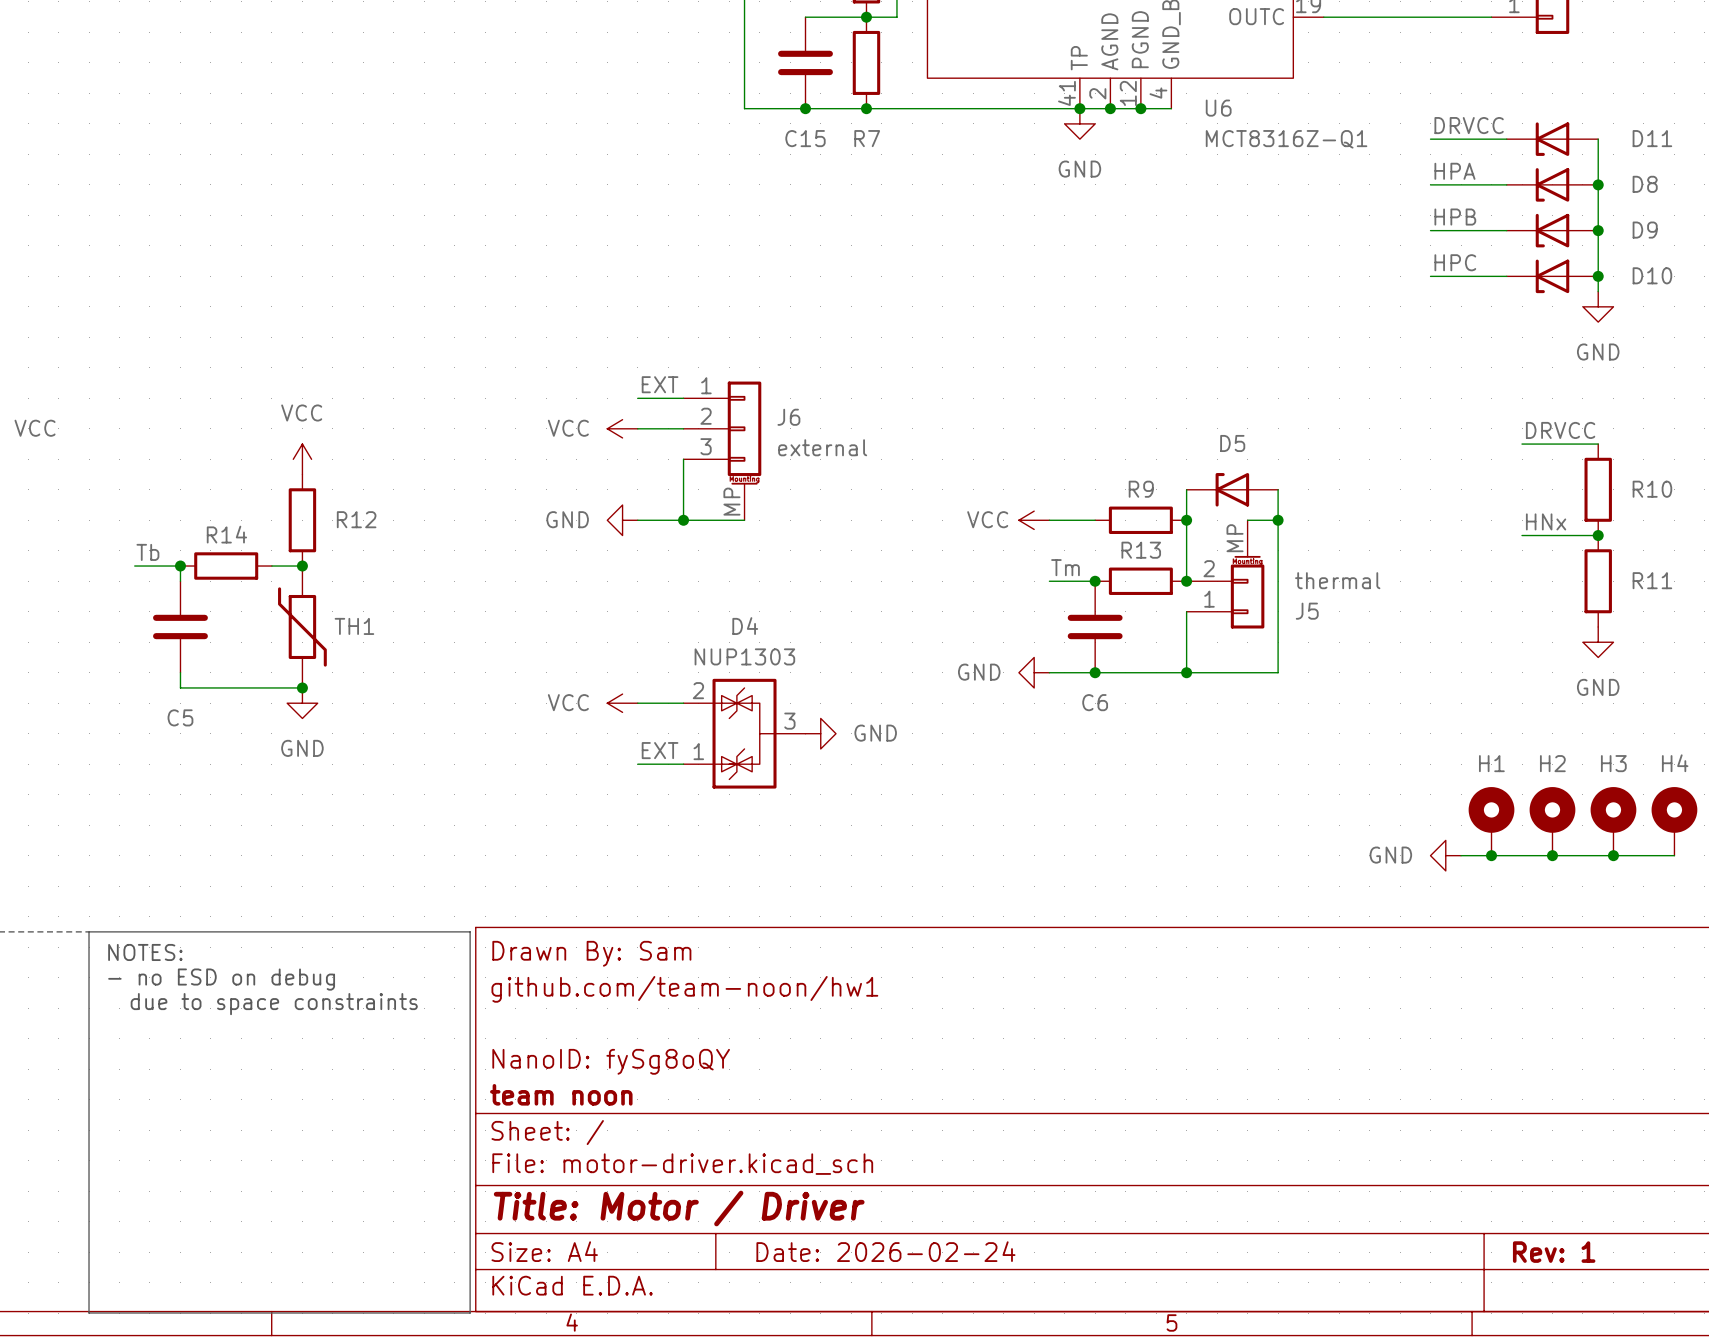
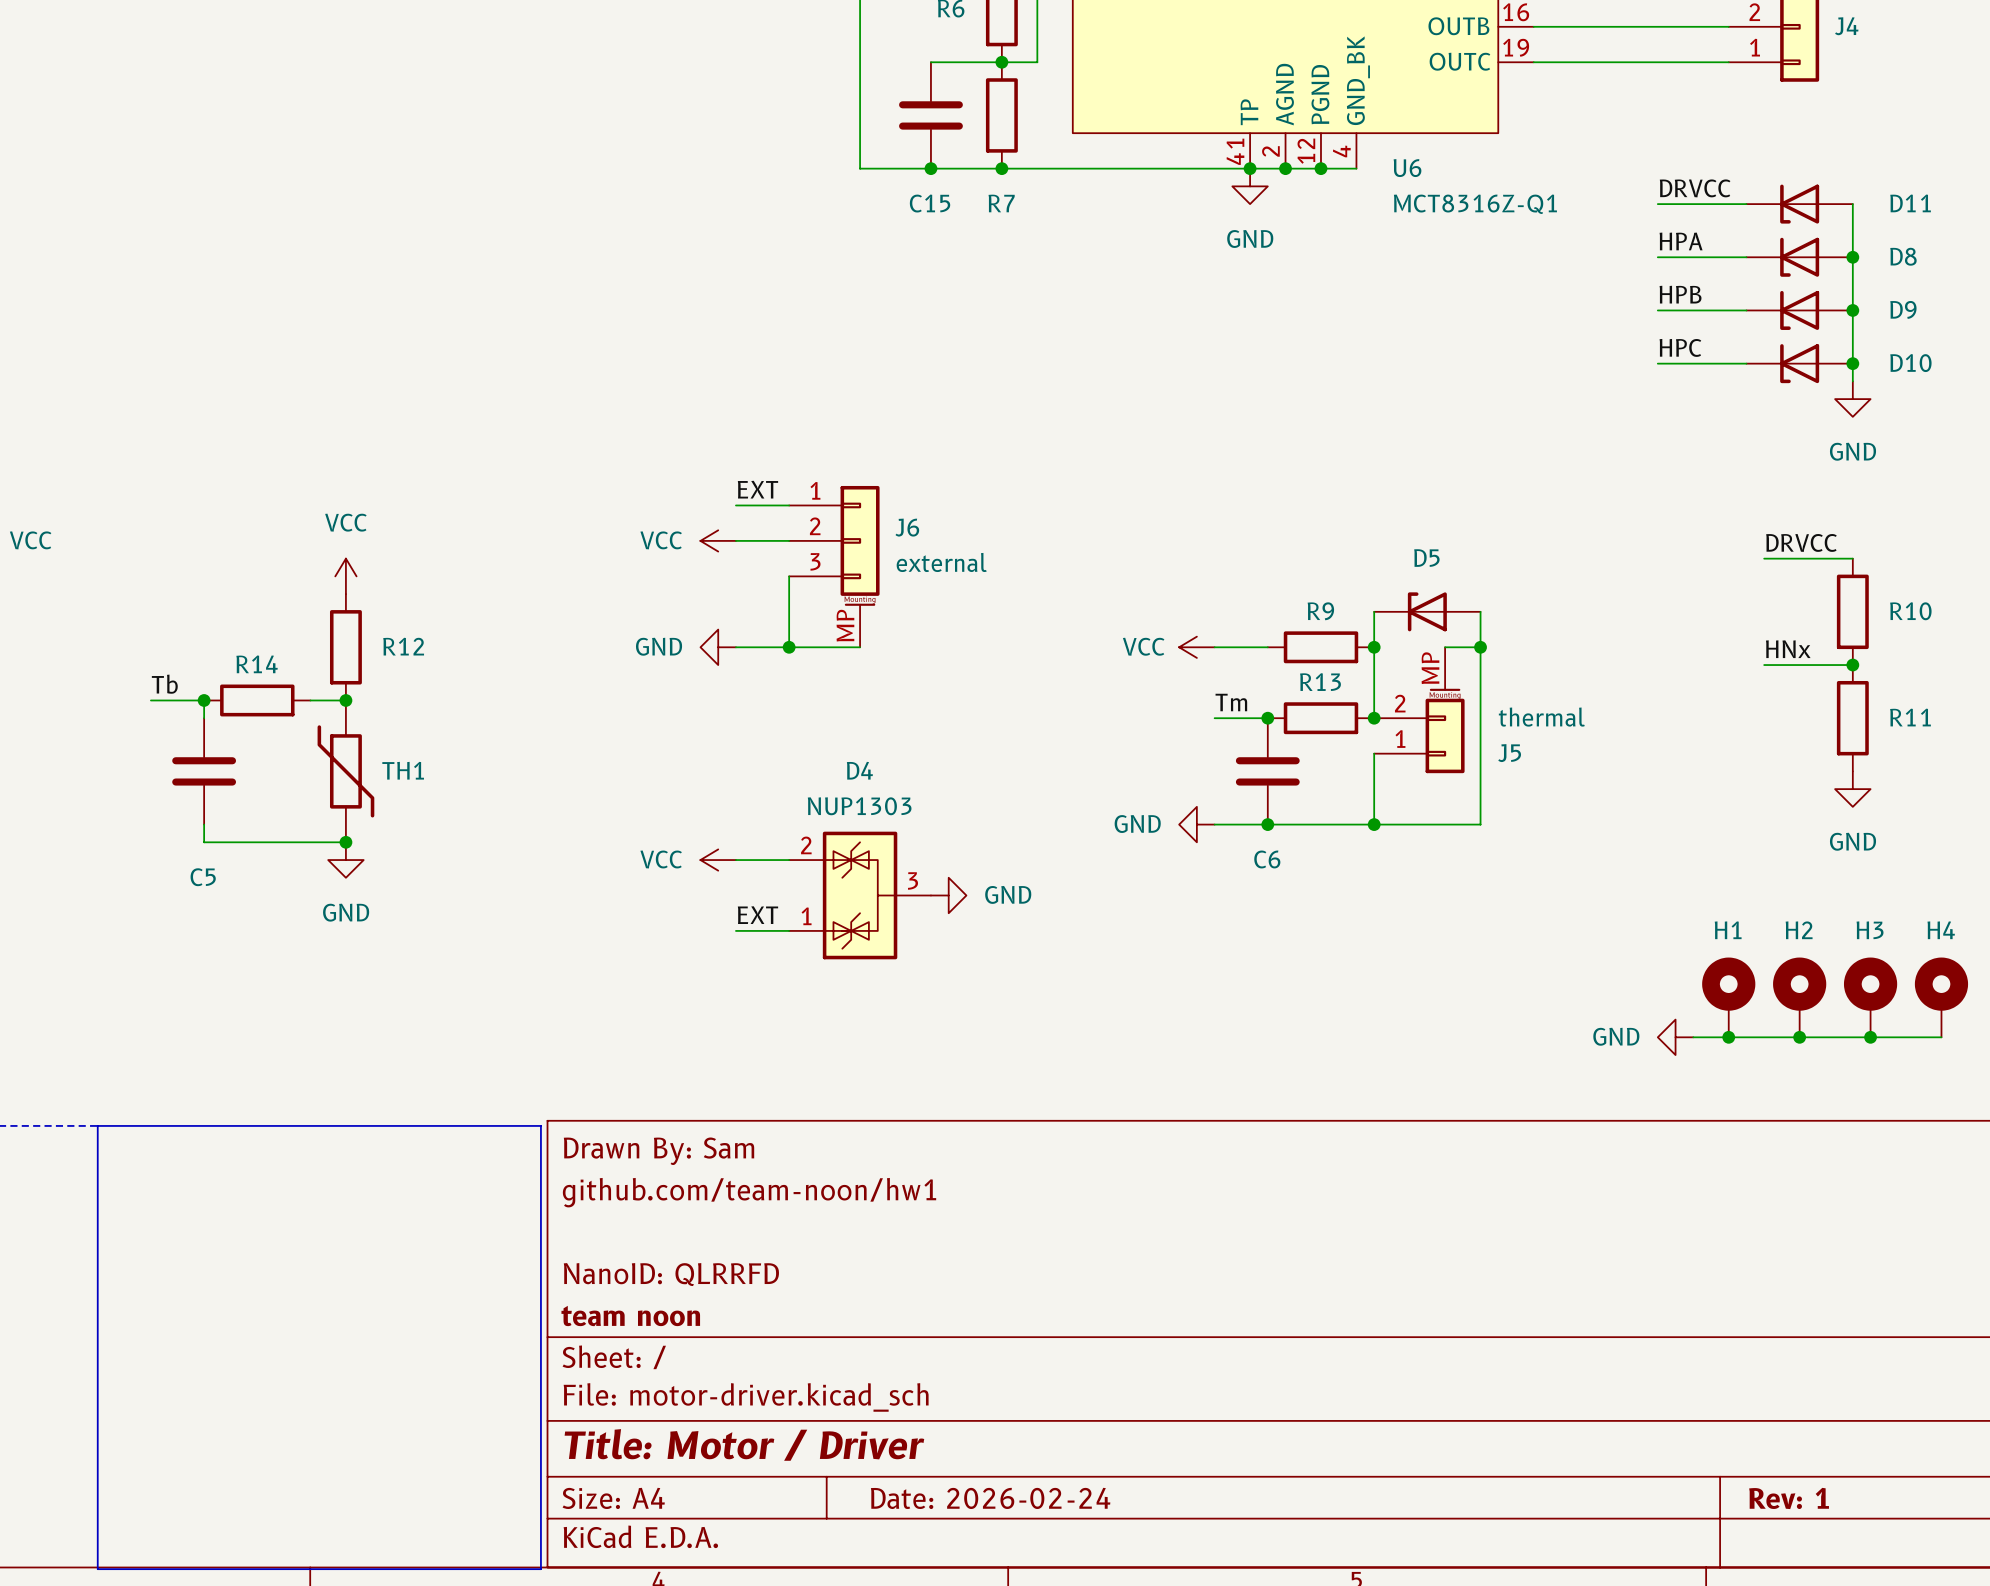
text: NOTES: (145, 952) -> none
text: - no ESD on debug (221, 979) -> none
text: due to space constraints (274, 1004) -> none
title block: NanoID: fySg8oQY (611, 1061) -> NanoID: QLRRFD (671, 1274)

